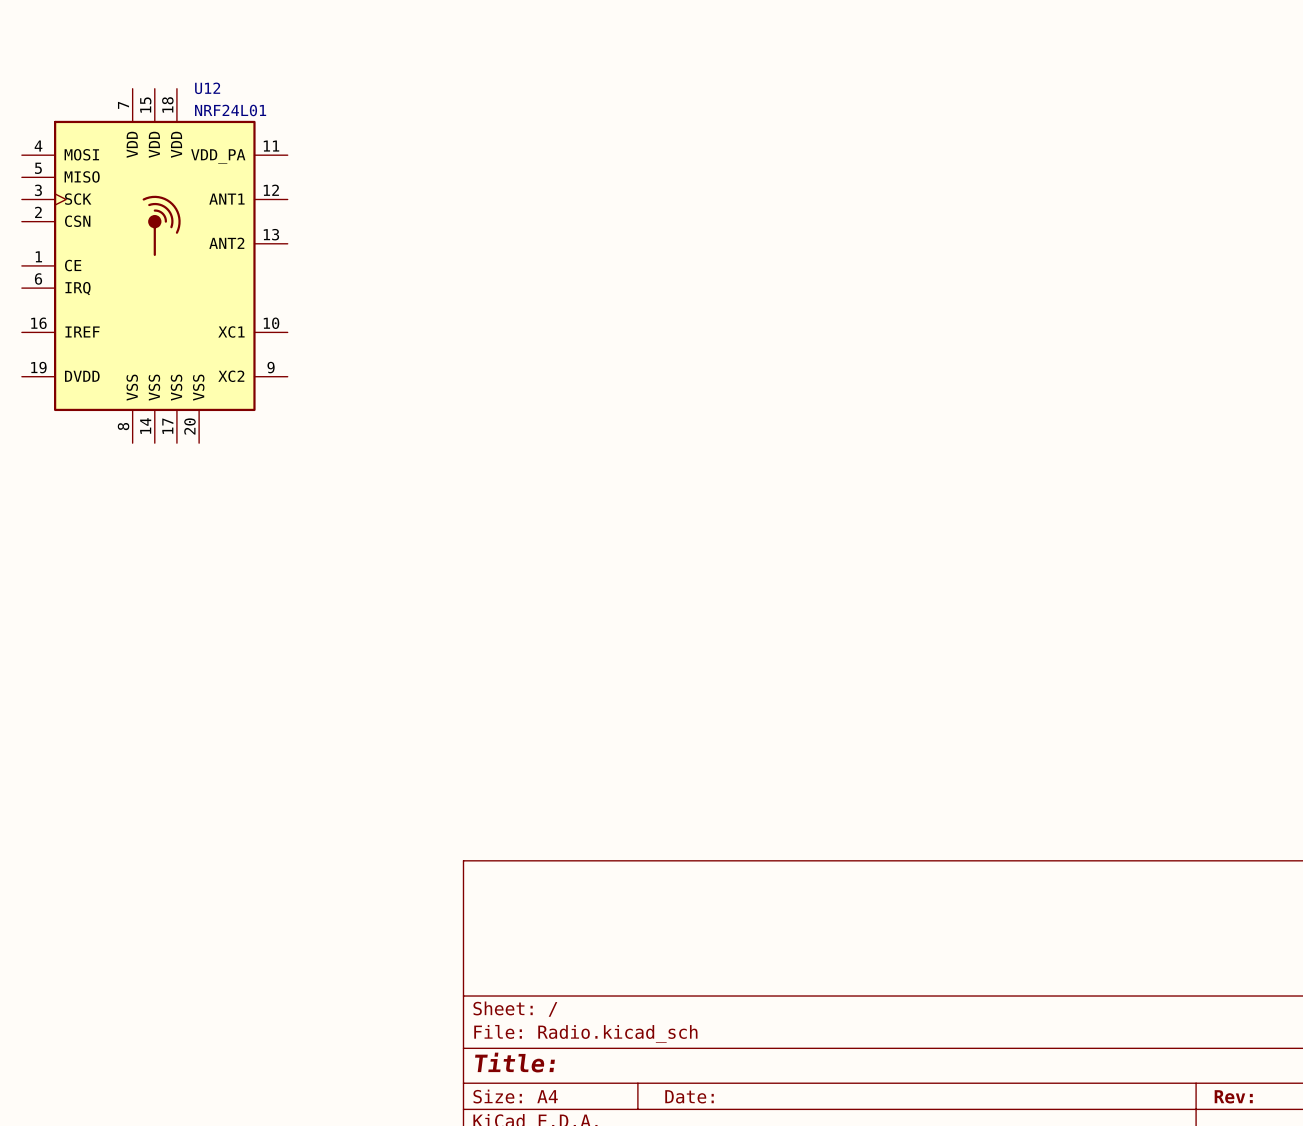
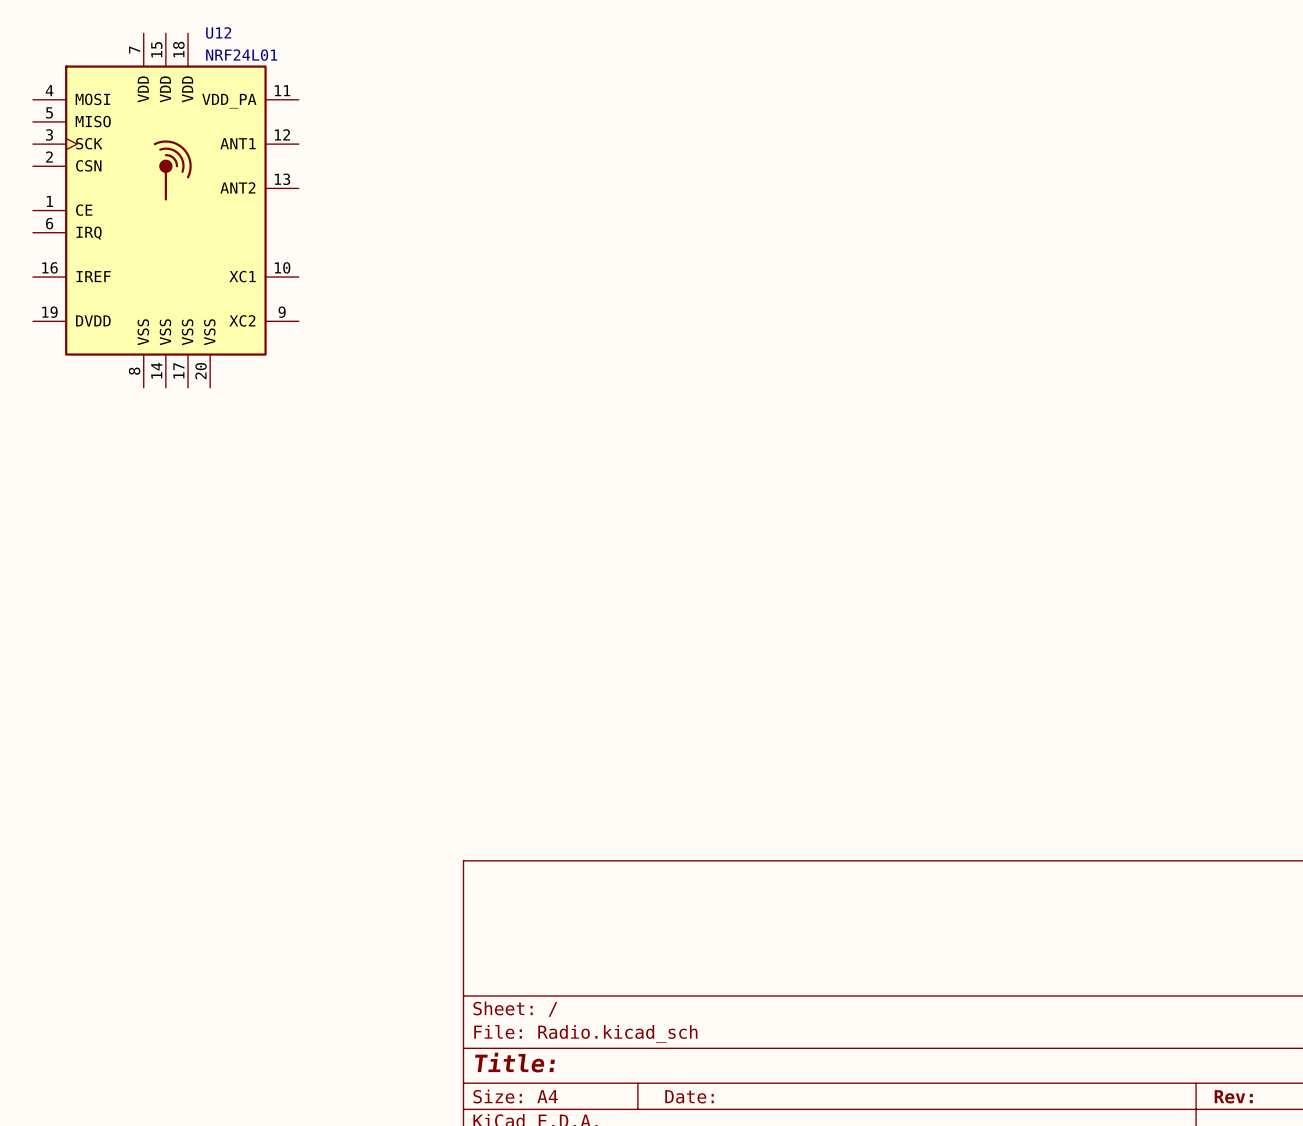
U12 position: (154, 265) -> (165, 210)

